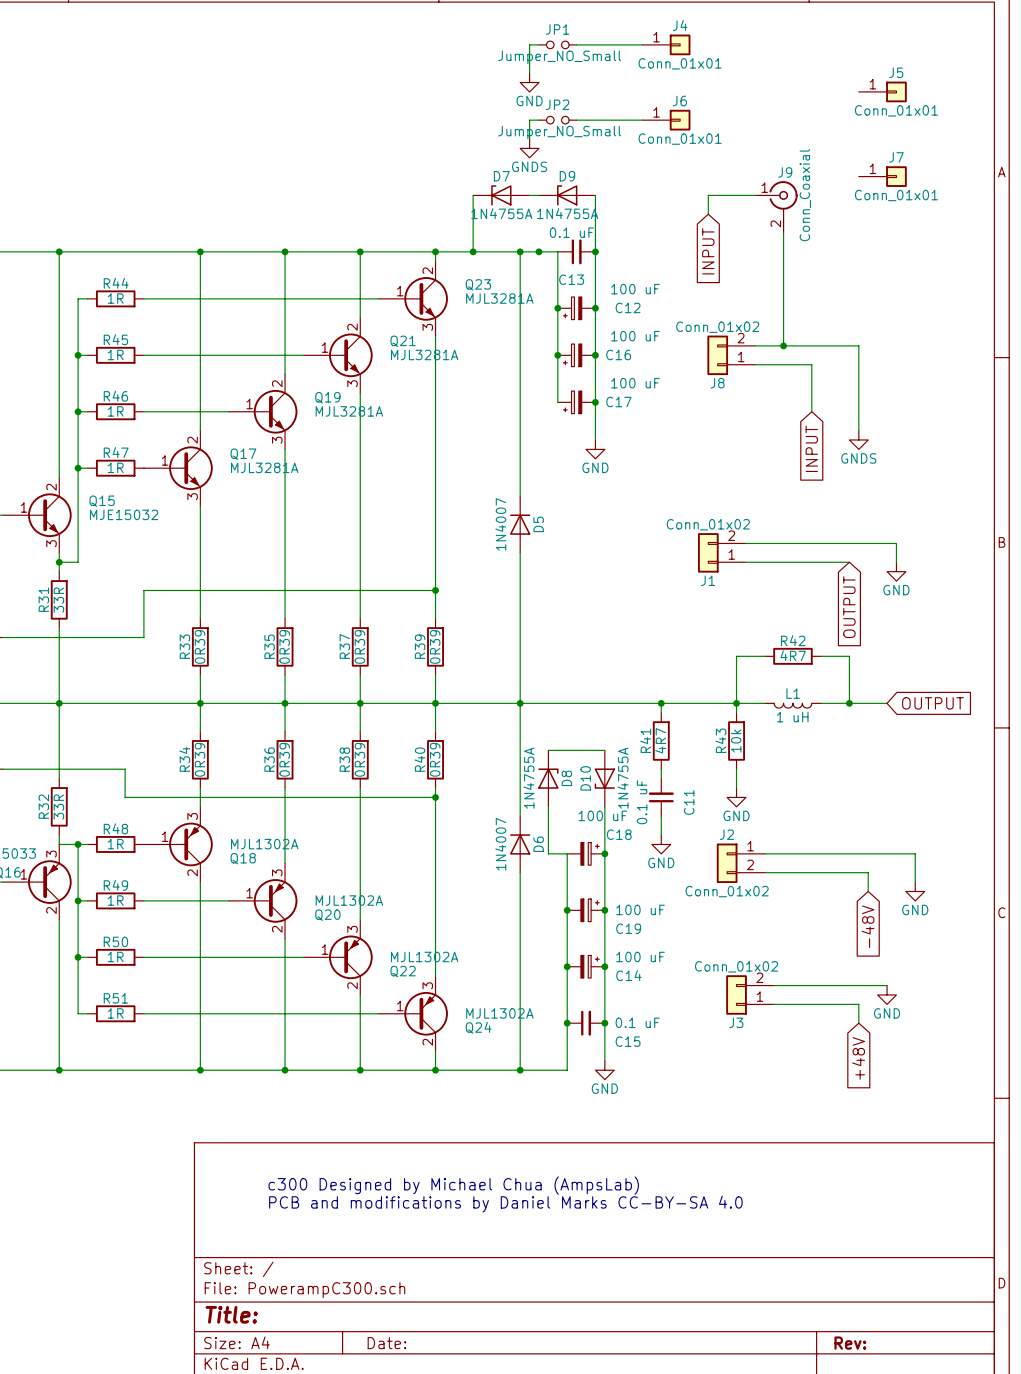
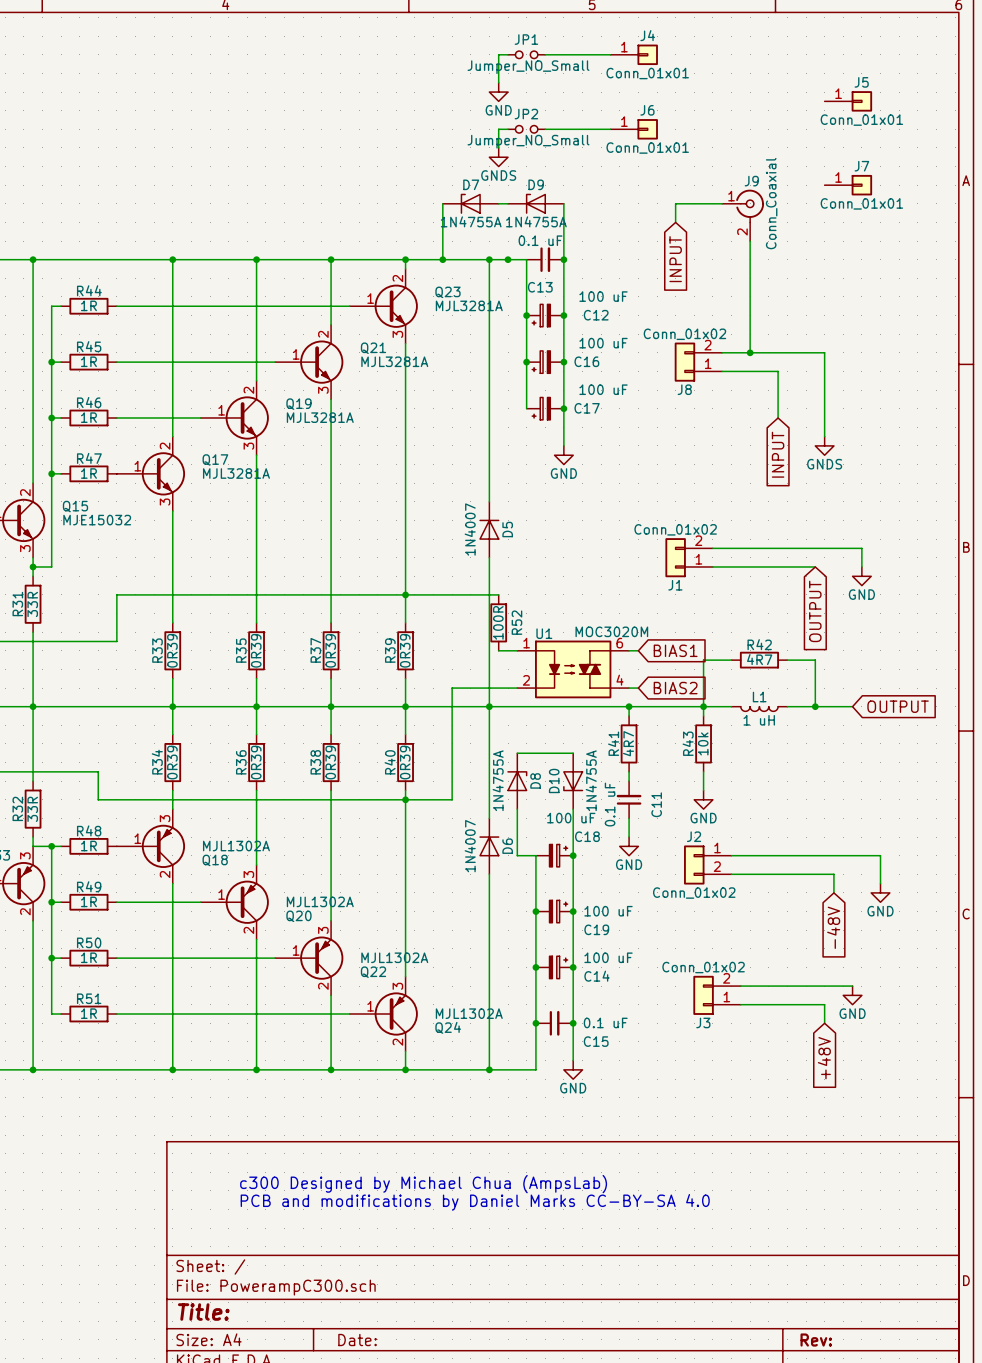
wire: none -> (405, 594) (498, 594)
R52: none -> 100R (498, 622)
wire: none -> (498, 650) (517, 650)
wire: none -> (629, 650) (638, 650)
global label: none -> BIAS1 (675, 650)
U1: none -> MOC3020M (573, 669)
wire: none -> (517, 688) (452, 688) (452, 799) (405, 799)
wire: none -> (629, 688) (638, 688)
global label: none -> BIAS2 (675, 688)

